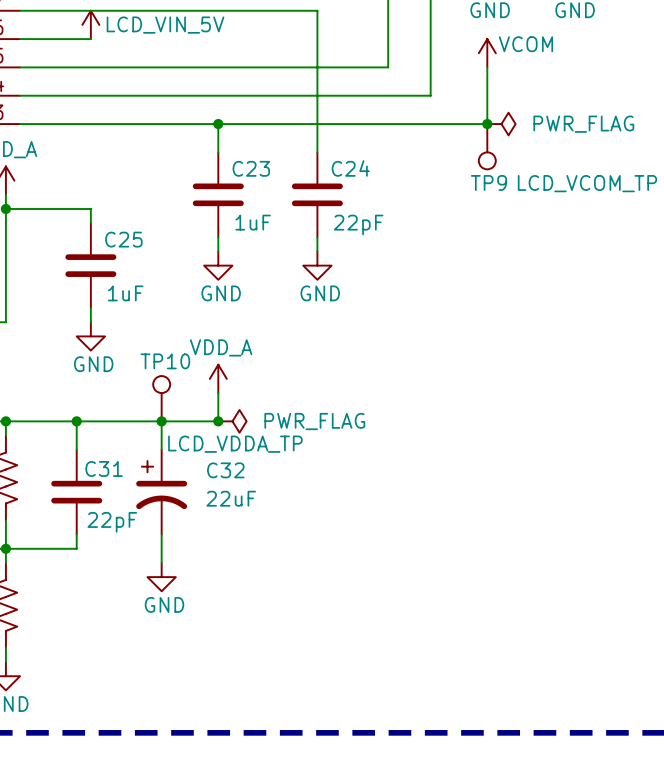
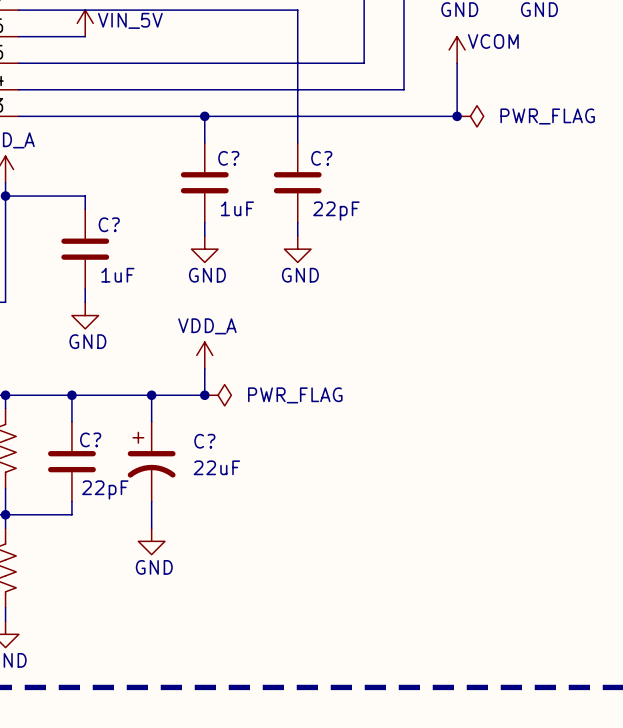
power symbol: LCD_VIN_5V (90, 24) -> VIN_5V (85, 23)
TP9: LCD_VCOM_TP (487, 146) -> none
C23 name: C23 (251, 168) -> C? (228, 158)
C24 name: C24 (350, 168) -> C? (321, 158)
C25 name: C25 (123, 239) -> C? (109, 224)
TP10: LCD_VDDA_TP (161, 398) -> none
C31 name: C31 (104, 468) -> C? (90, 439)
C32 name: C32 (225, 470) -> C? (204, 441)

